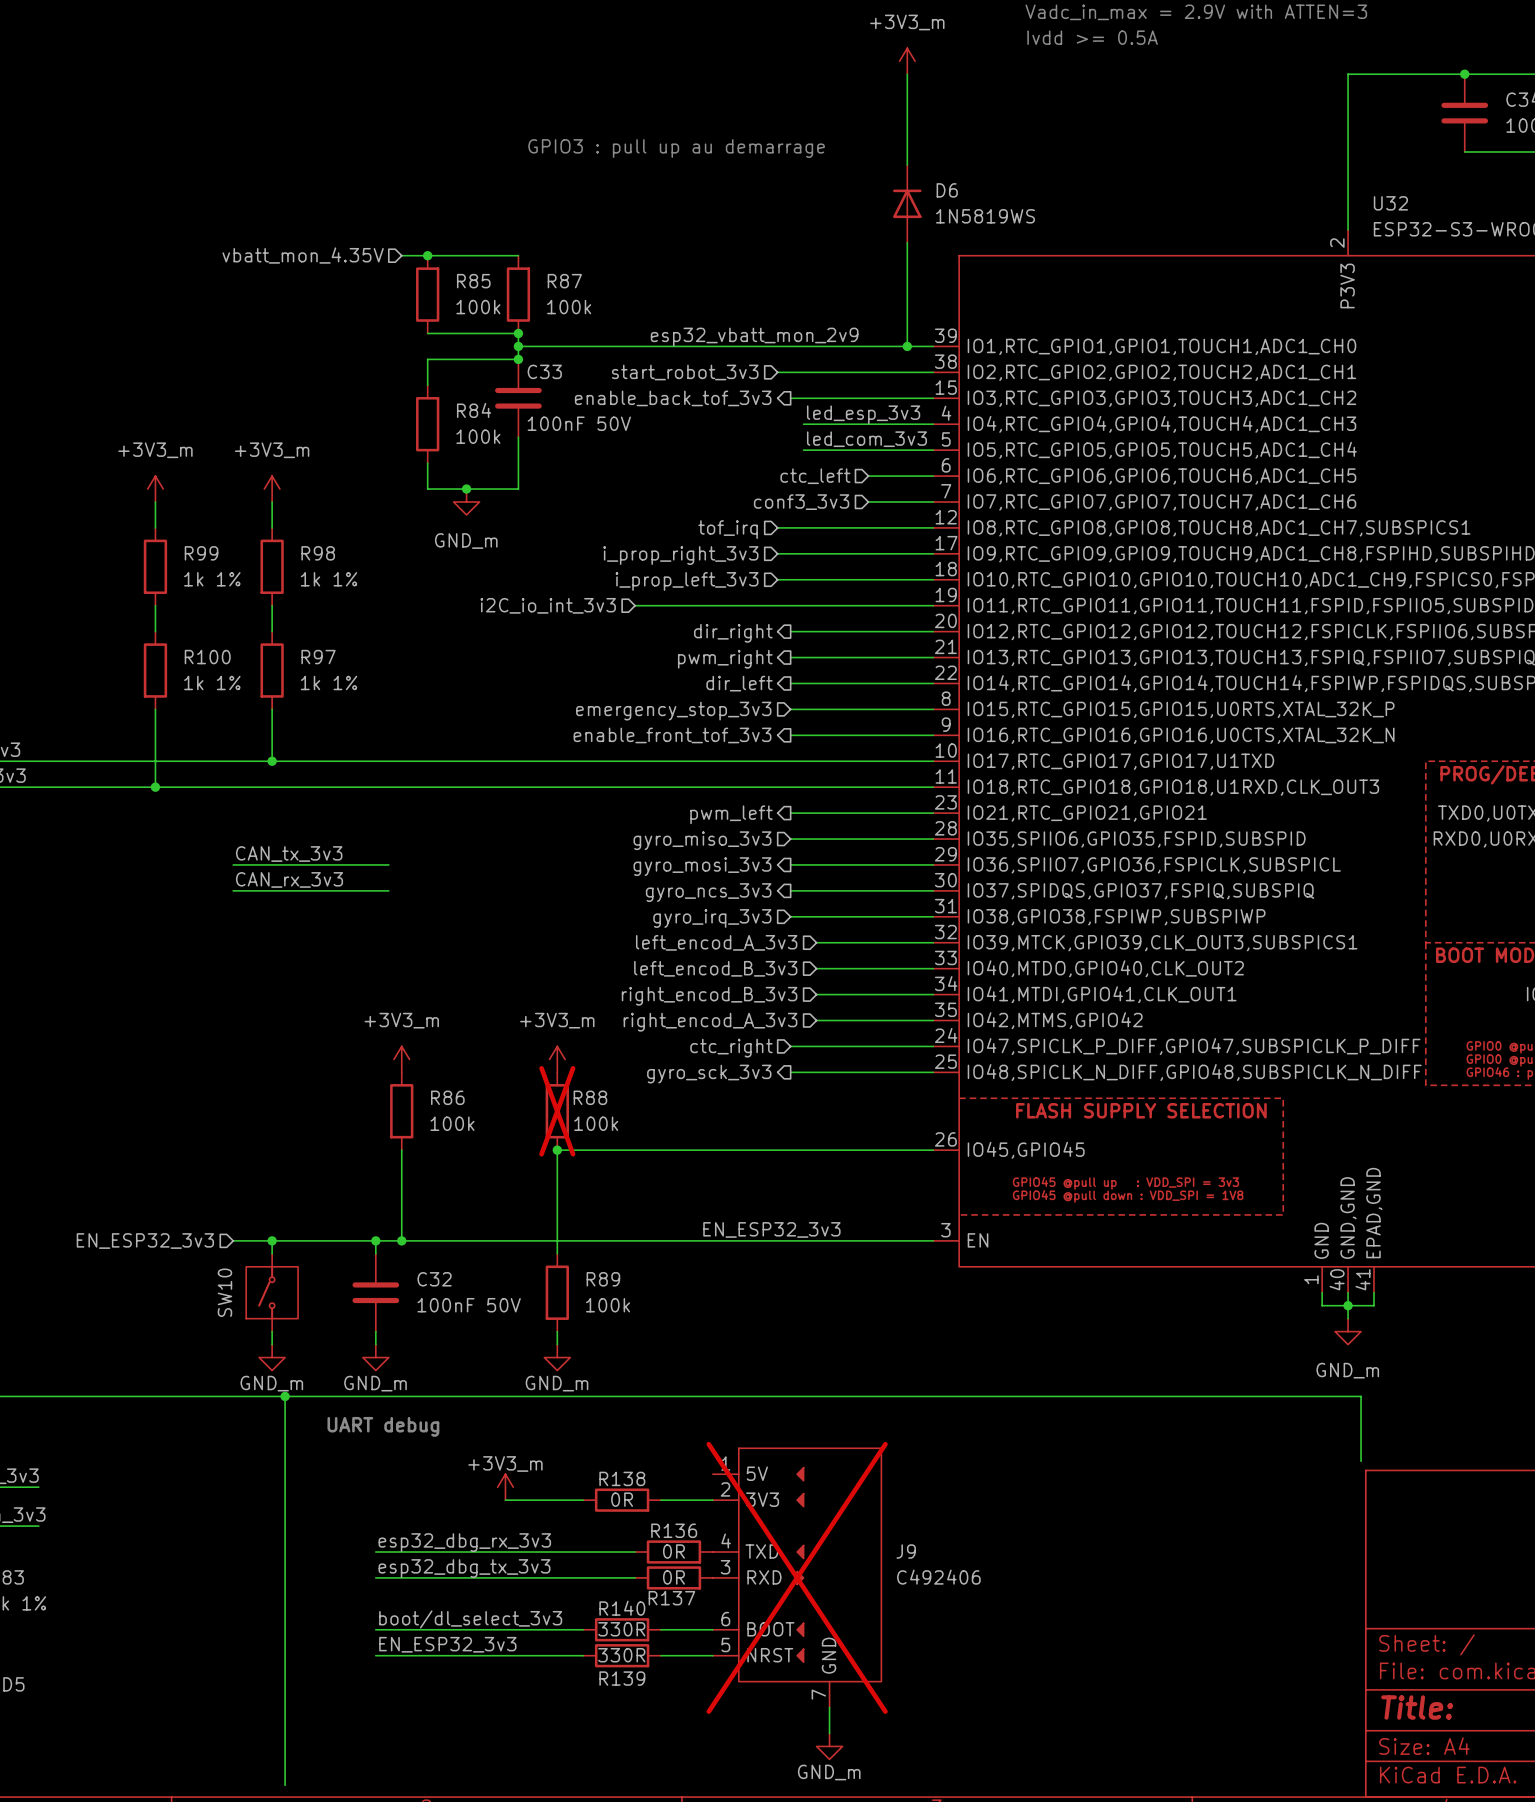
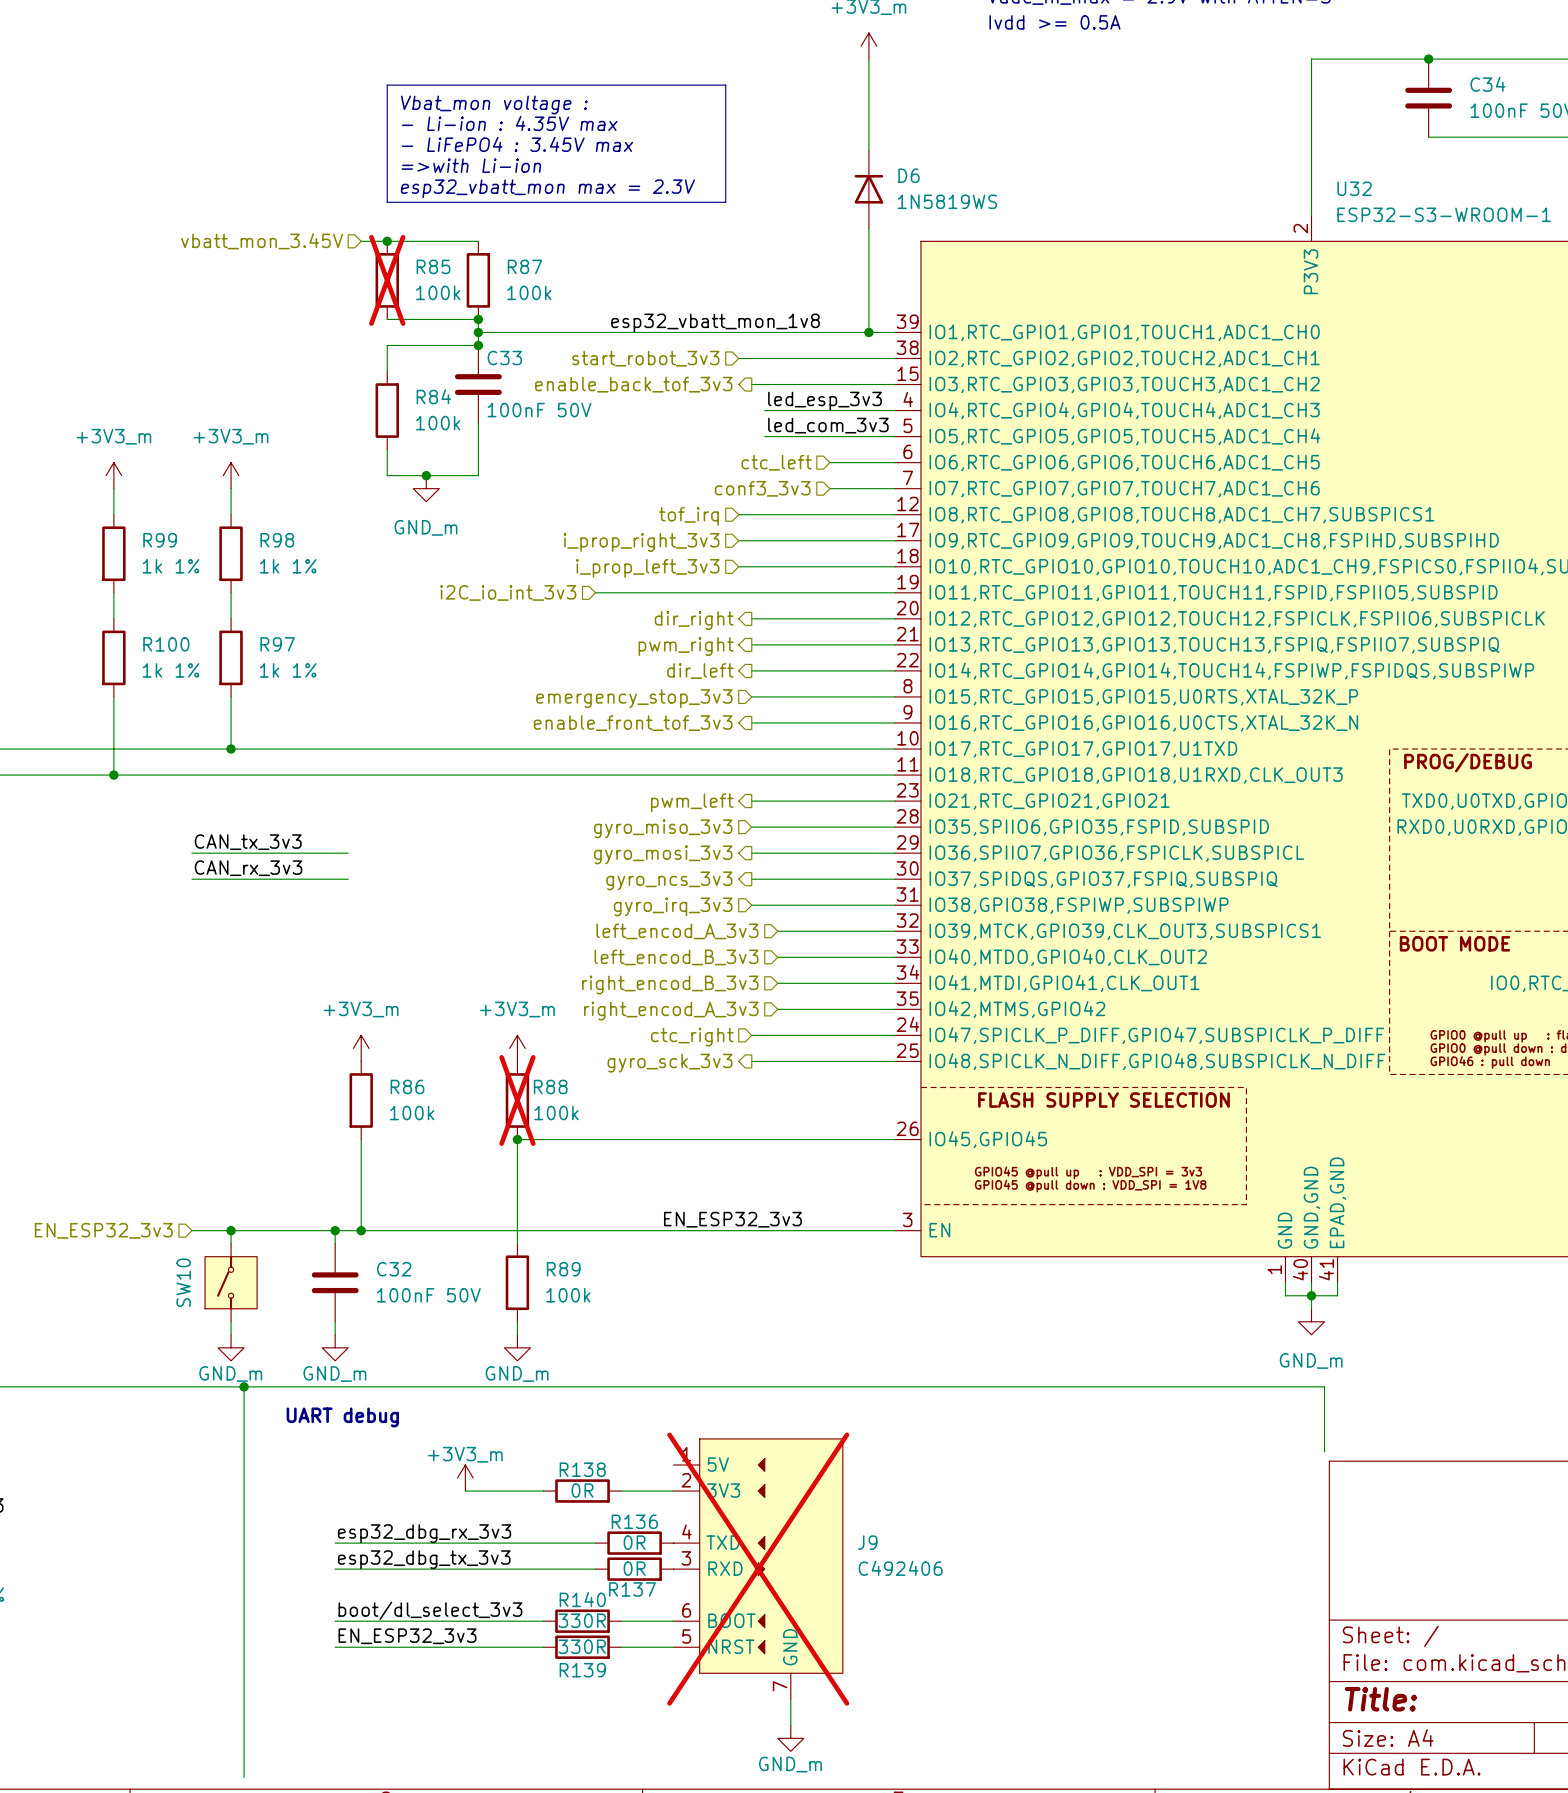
line: none -> (387, 85) (725, 85) (725, 202) (387, 202) (387, 85)
text: none -> Vbat_mon voltage : (494, 104)
text: none -> - Li-ion : 4.35V max (509, 123)
text: GPIO3 : pull up au demarrage (676, 148) -> none
text: none -> - LiFePO4 : 3.45V max (517, 144)
text: none -> =>with Li-ion (471, 165)
text: none -> esp32_vbatt_mon max = 2.3V (547, 188)
hierarchical label: vbatt_mon_4.35V (303, 255) -> vbatt_mon_3.45V (262, 241)
R85 do-not-place cross: none -> (387, 280)
label: esp32_vbatt_mon_2v9 (754, 337) -> esp32_vbatt_mon_1v8 (715, 323)

